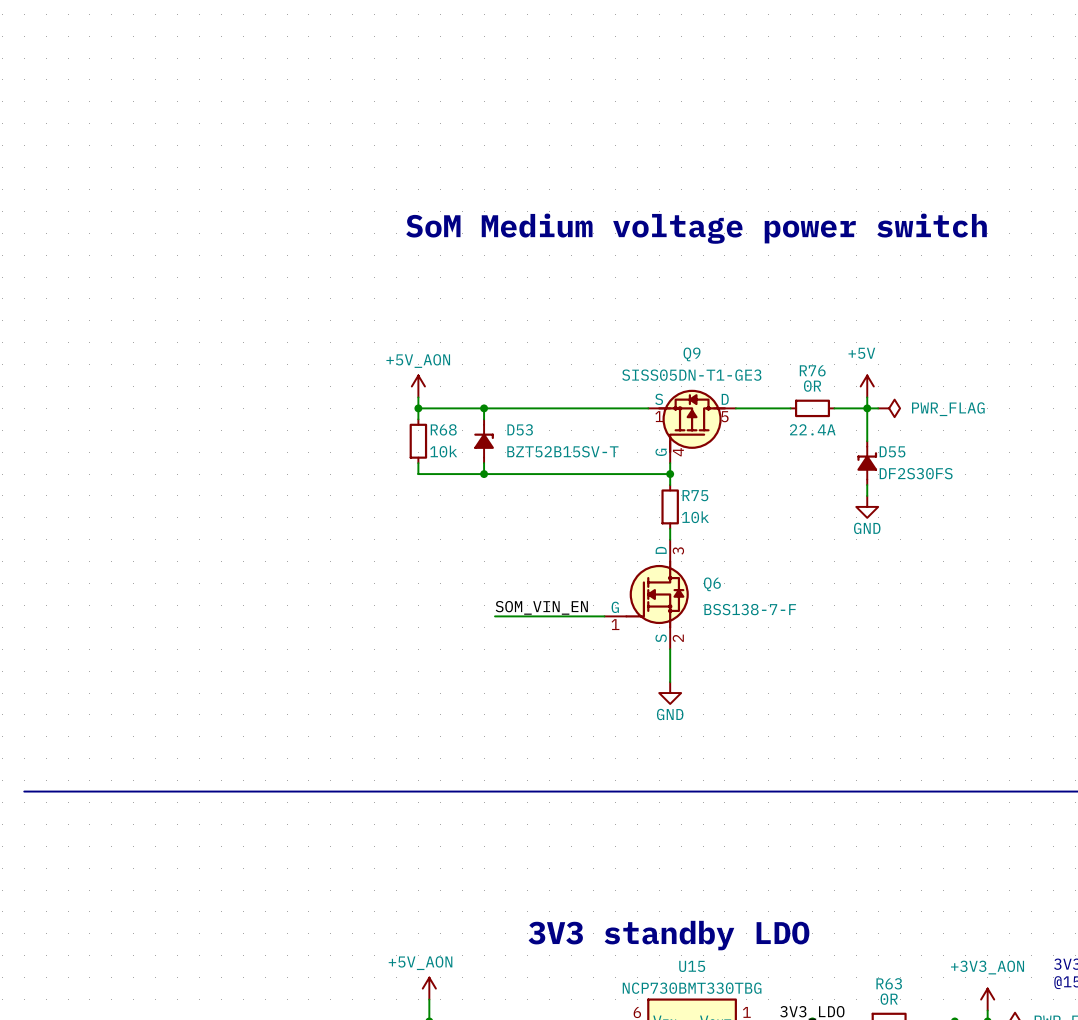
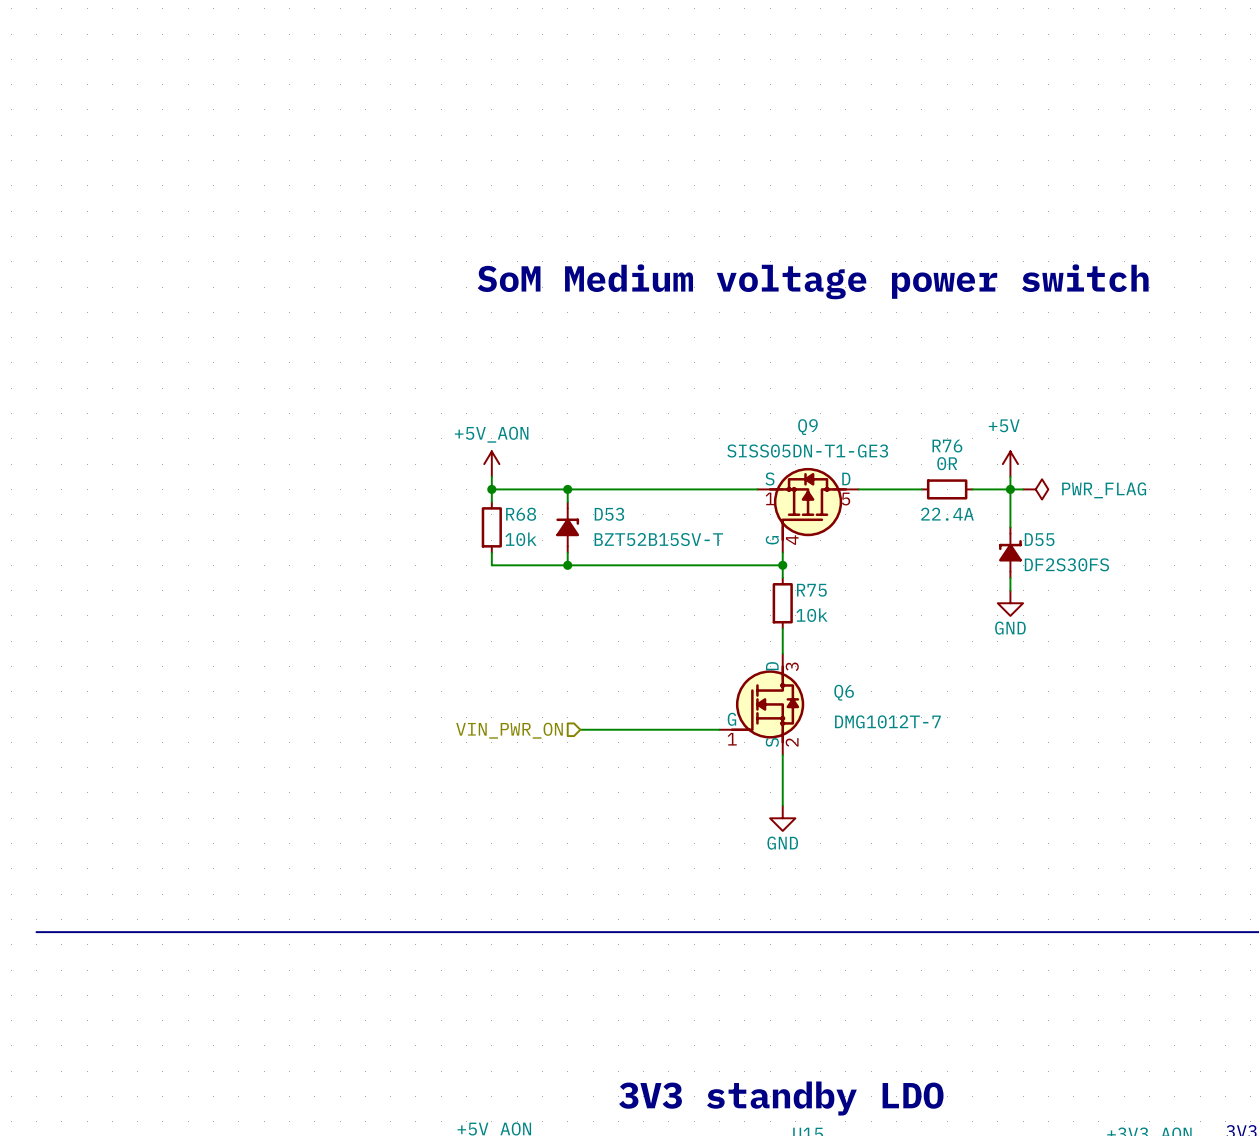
Q6 symbol: [604, 539, 689, 650] -> [719, 653, 805, 756]
label: SOM_VIN_EN (541, 607) -> none
Q6 text: BSS138-7-F (750, 609) -> DMG1012T-7 (887, 721)
hierarchical label: none -> VIN_PWR_ON (509, 730)

